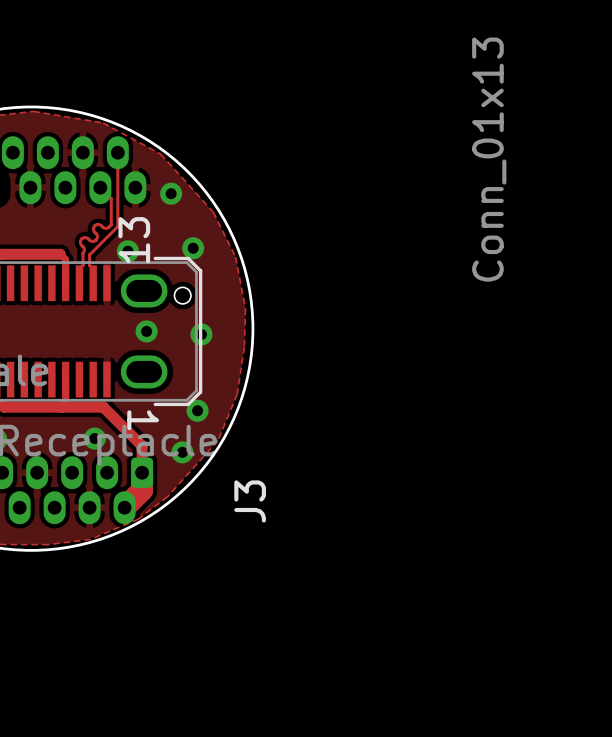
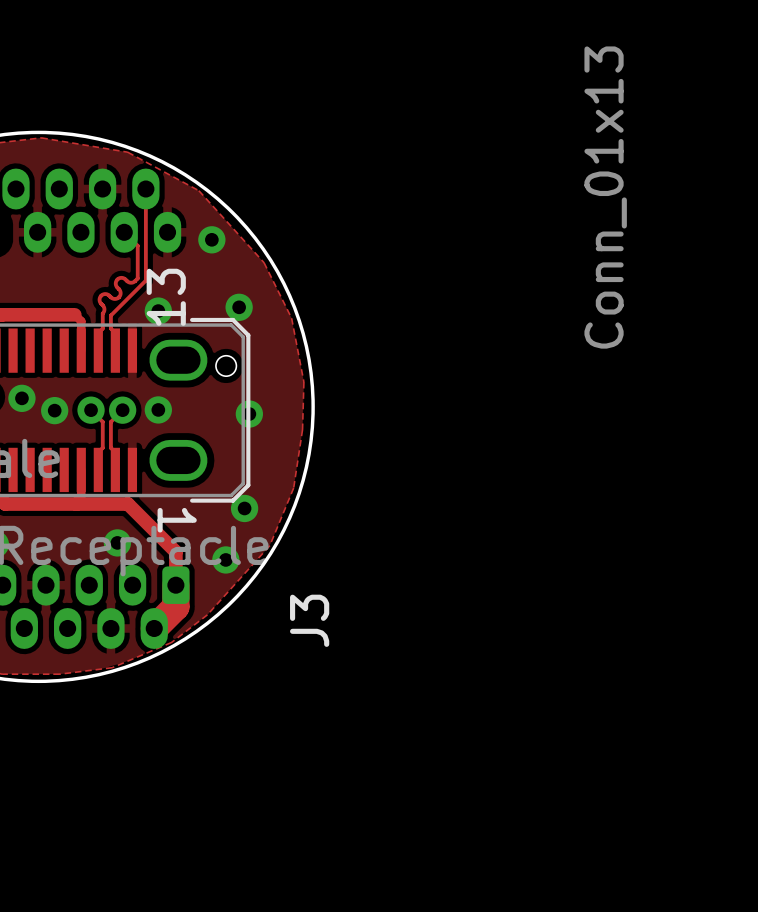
via: none -> (21, 398)
via: none -> (54, 410)
track: none -> (91, 410) (102, 421) (102, 447) (98, 452) (98, 469)
via: none -> (91, 410)
track: none -> (122, 410) (110, 421) (110, 447) (115, 452) (115, 469)
via: none -> (122, 410)
via position: (146, 331) -> (158, 409)

